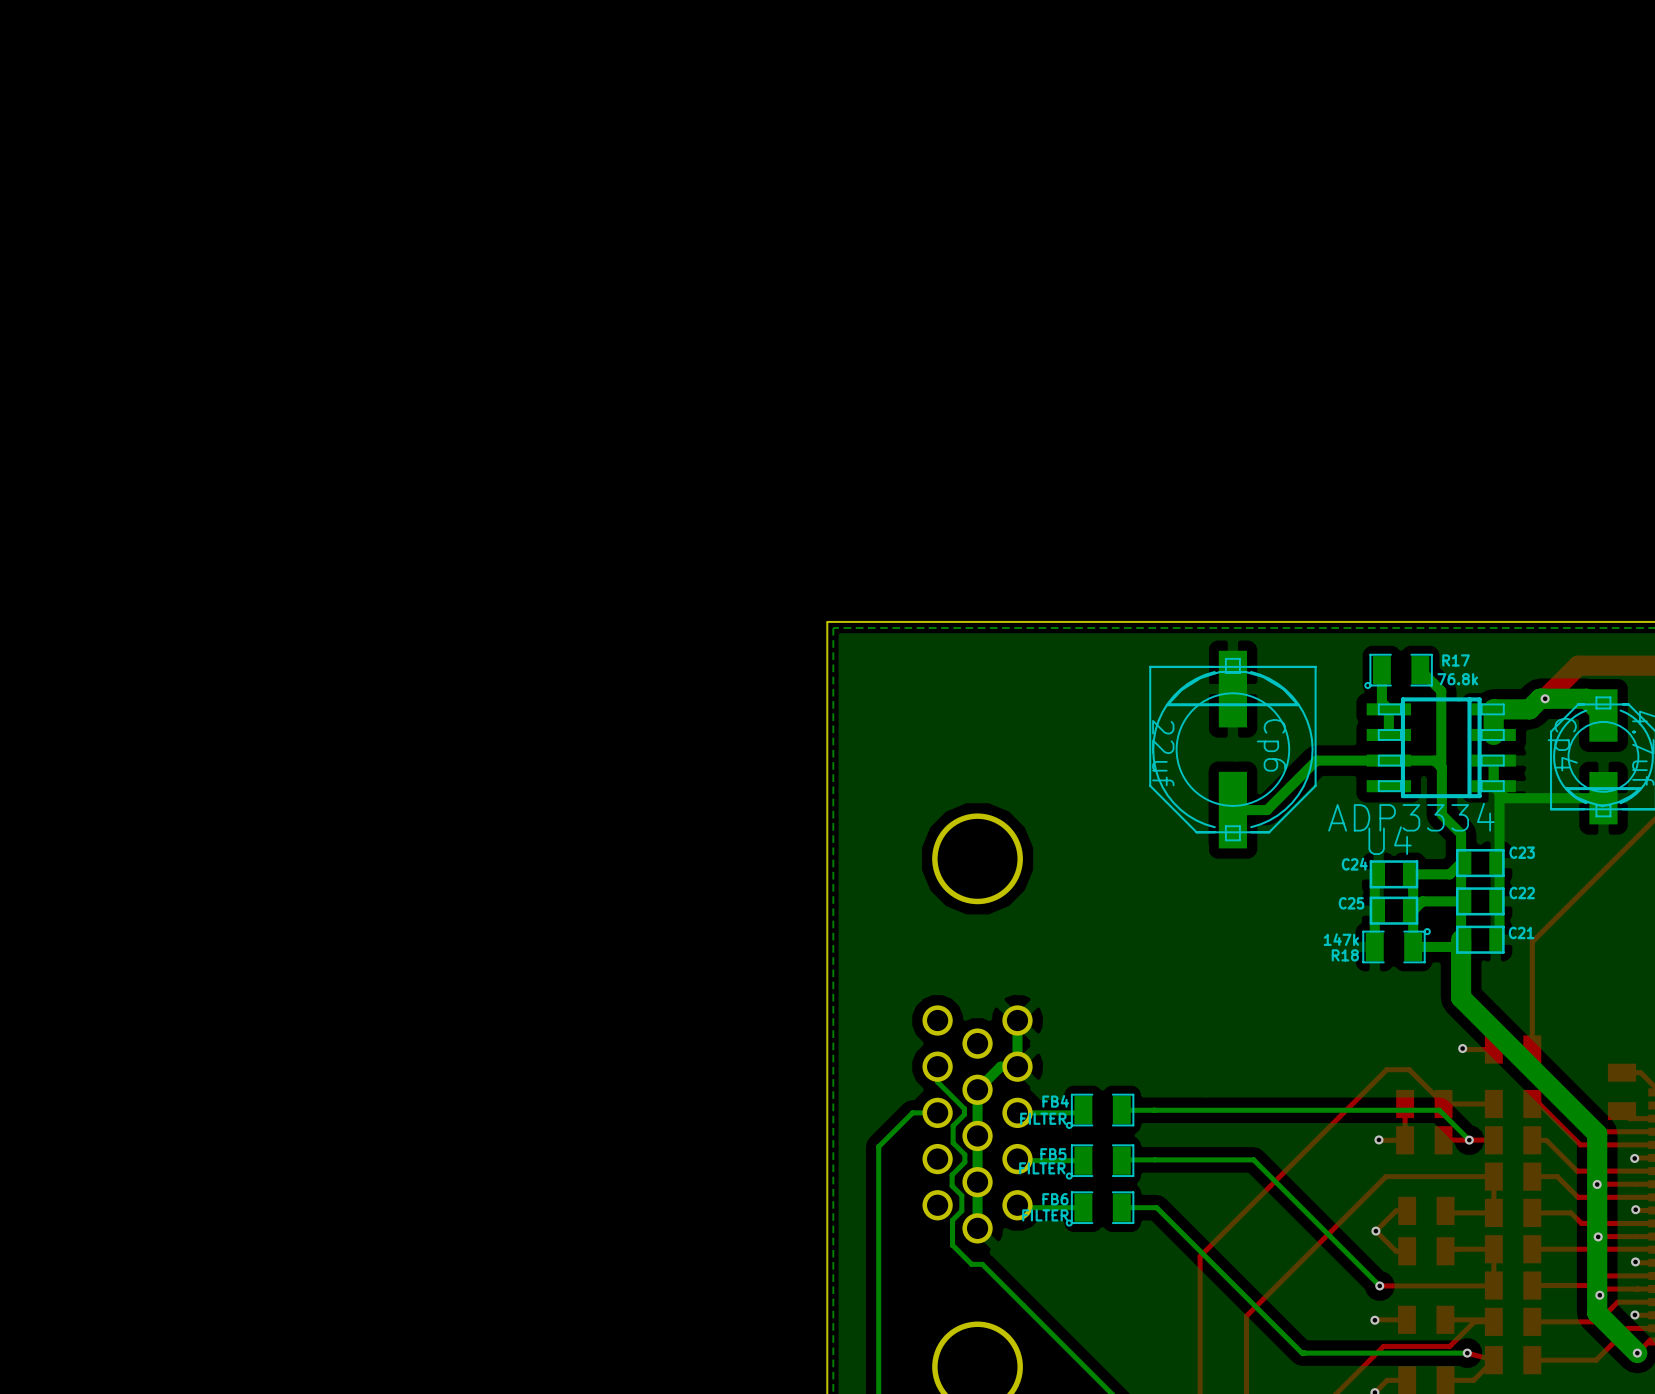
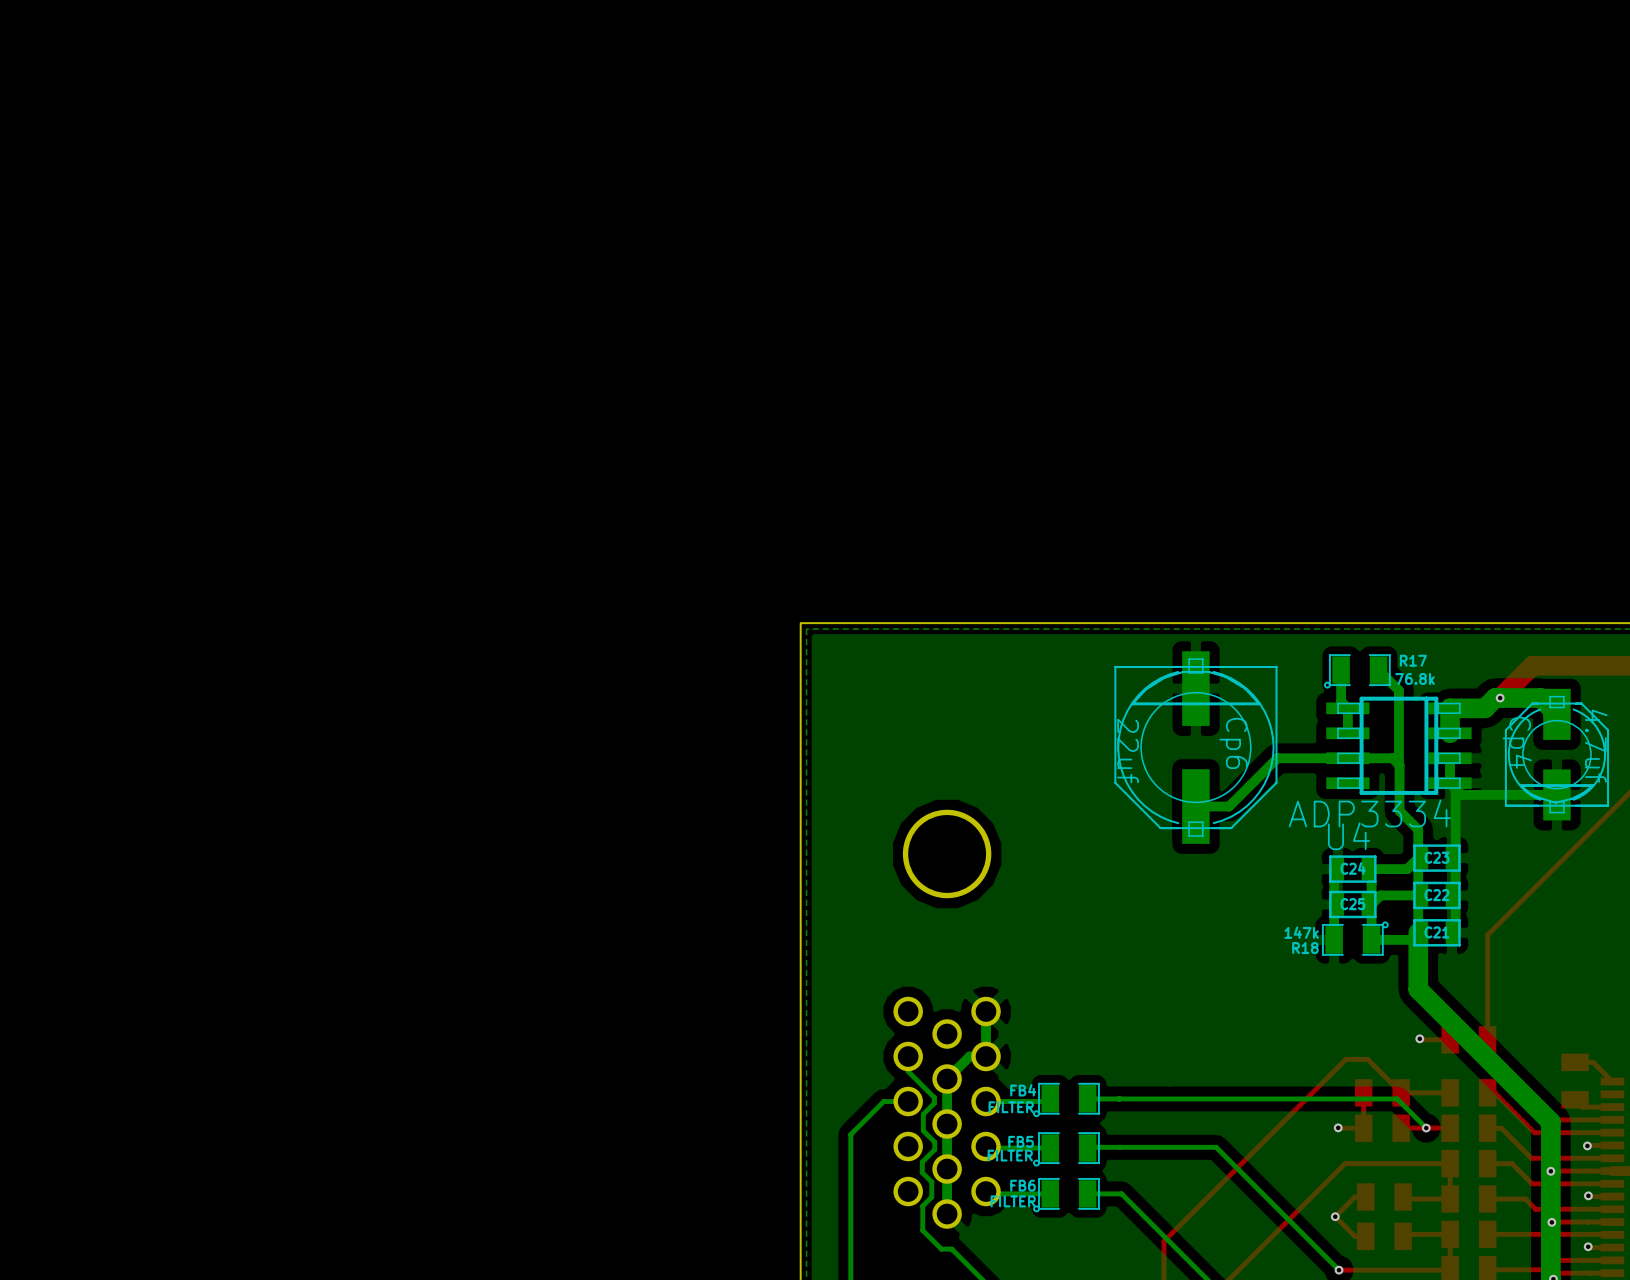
C23 name position: C23 (1522, 852) -> C23 (1436, 857)
C24 name position: C24 (1354, 864) -> C24 (1353, 868)
C22 name position: C22 (1522, 893) -> C22 (1436, 895)
C25 name position: C25 (1351, 903) -> C25 (1352, 904)
C21 name position: C21 (1521, 932) -> C21 (1436, 932)

